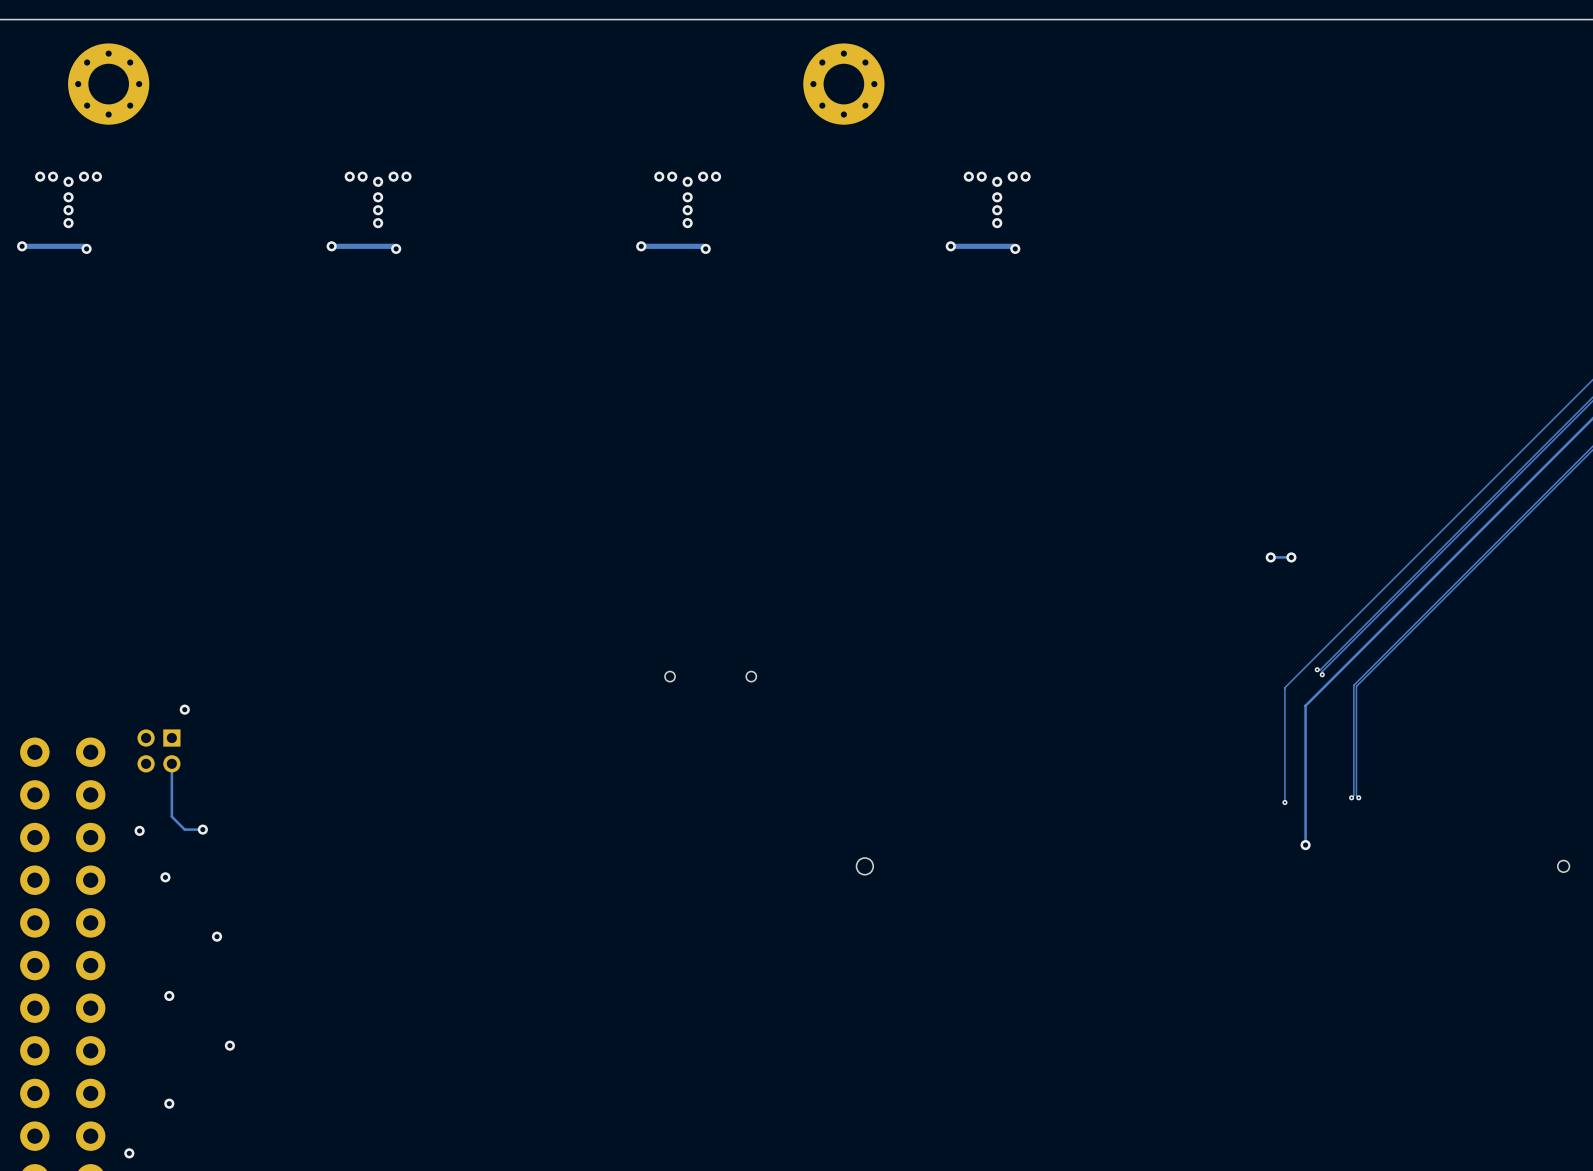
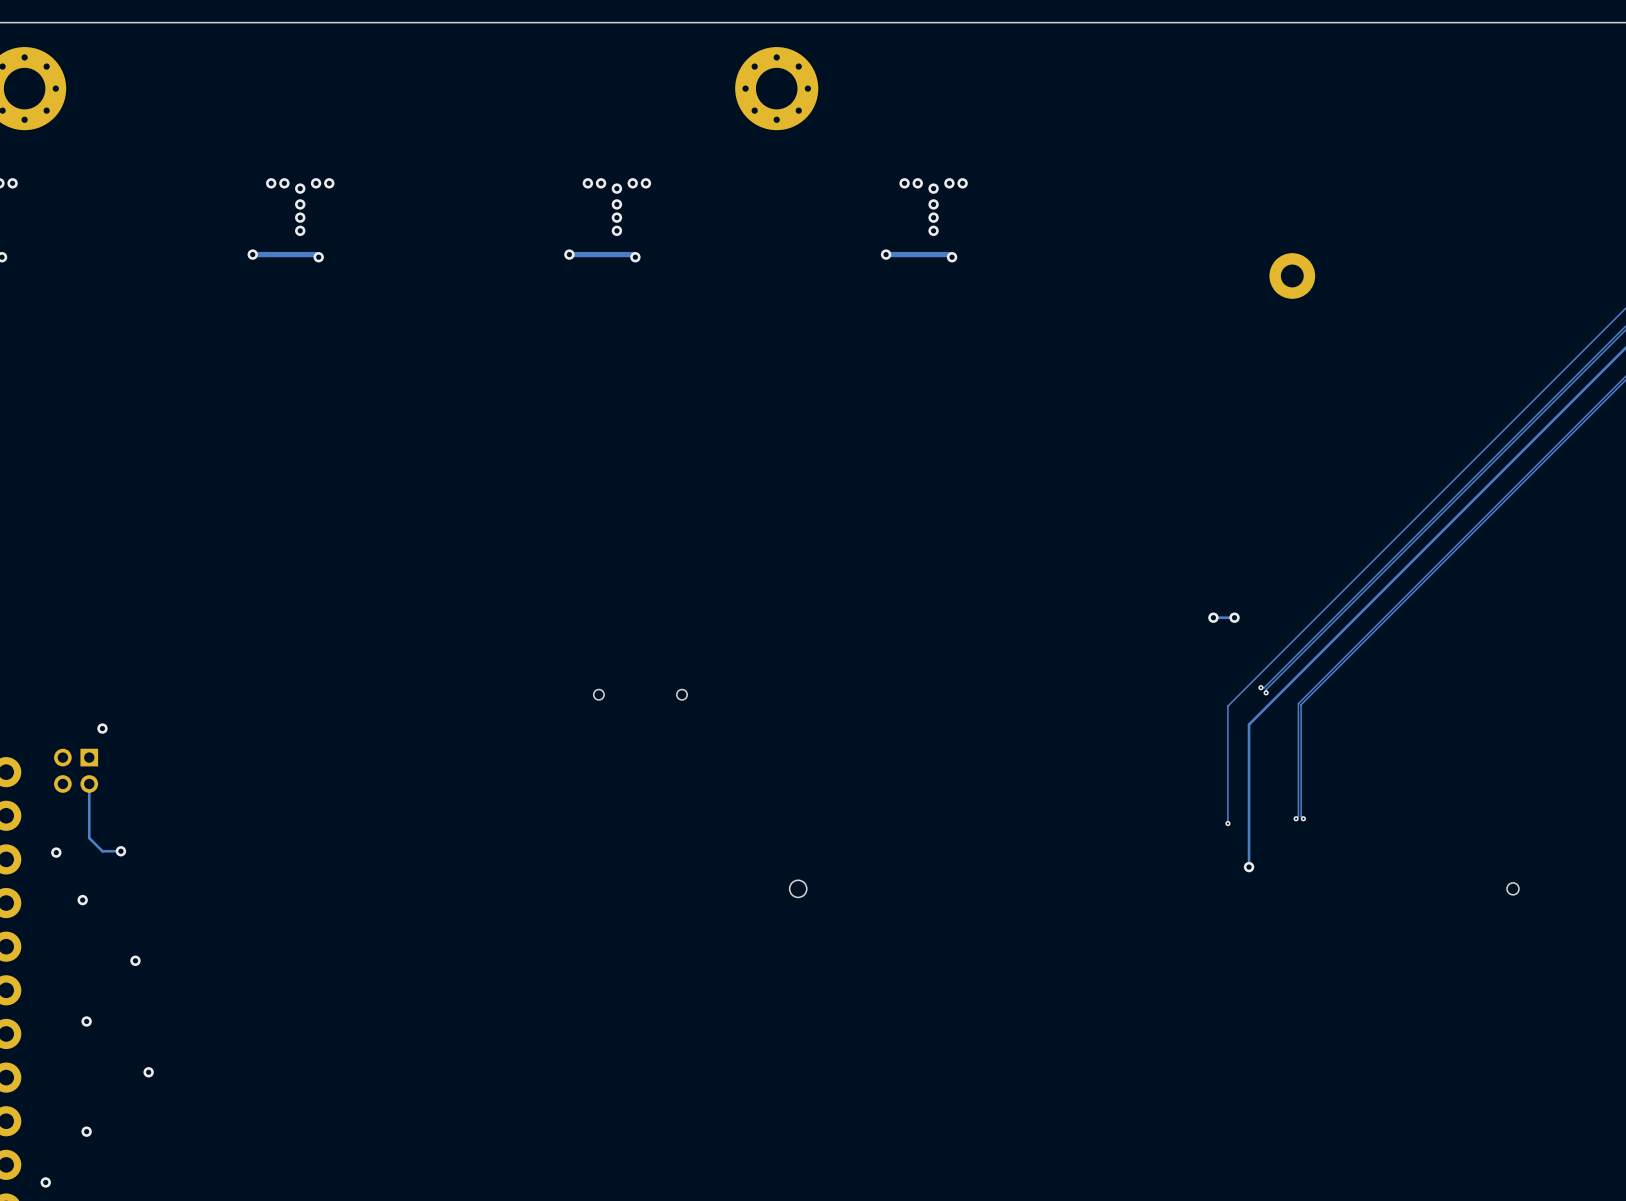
part: none -> (1292, 275)
via: (1270, 557) -> none
track: (1291, 557) (1270, 557) -> (1234, 617) (1213, 617)
via: (1291, 557) -> none
via: none -> (1213, 617)
via: none -> (1234, 617)

